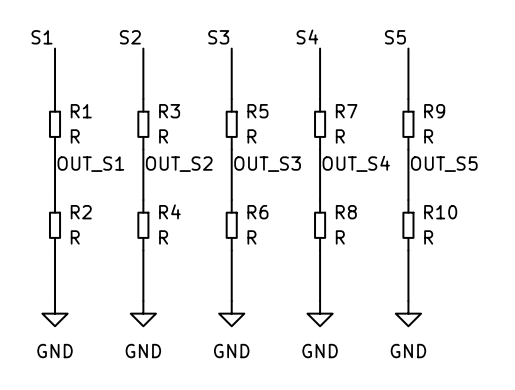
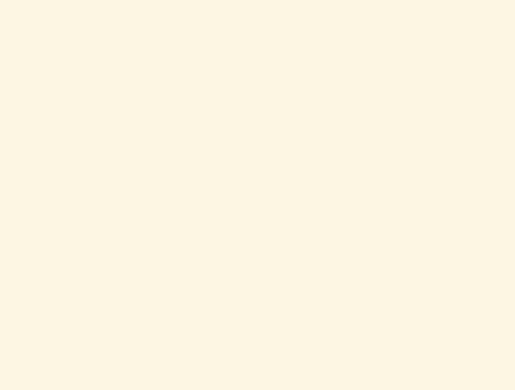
label: S1 (41, 37) -> none
label: S2 (130, 37) -> none
label: S3 (218, 37) -> none
label: S4 (307, 37) -> none
label: S5 (395, 37) -> none
wire: (55, 48) (55, 99) -> none
wire: (143, 48) (143, 99) -> none
wire: (231, 48) (231, 99) -> none
wire: (320, 48) (320, 99) -> none
wire: (408, 48) (408, 99) -> none
R1: R (55, 124) -> none
R3: R (143, 124) -> none
R5: R (231, 124) -> none
R7: R (320, 124) -> none
R9: R (408, 124) -> none
wire: (55, 149) (55, 200) -> none
wire: (143, 149) (143, 200) -> none
wire: (231, 149) (231, 200) -> none
wire: (320, 149) (320, 200) -> none
wire: (408, 149) (408, 200) -> none
label: OUT_S4 (356, 163) -> none
label: OUT_S1 (90, 164) -> none
label: OUT_S2 (179, 164) -> none
label: OUT_S3 (267, 164) -> none
label: OUT_S5 (444, 164) -> none
R2: R (55, 225) -> none
R4: R (143, 225) -> none
R6: R (231, 225) -> none
R8: R (320, 225) -> none
R10: R (408, 225) -> none
wire: (55, 250) (55, 301) -> none
wire: (143, 250) (143, 301) -> none
wire: (231, 250) (231, 301) -> none
wire: (320, 250) (320, 301) -> none
wire: (408, 250) (408, 301) -> none
power symbol: GND (55, 313) -> none
power symbol: GND (143, 313) -> none
power symbol: GND (231, 313) -> none
power symbol: GND (320, 313) -> none
power symbol: GND (408, 313) -> none

